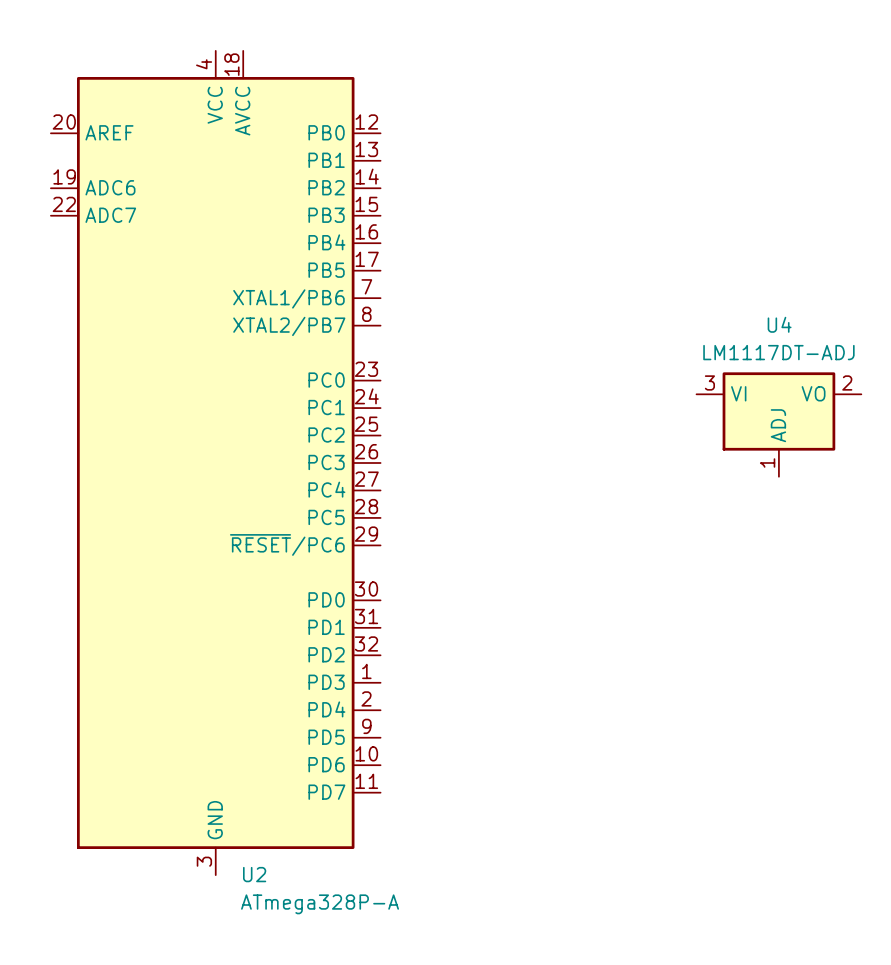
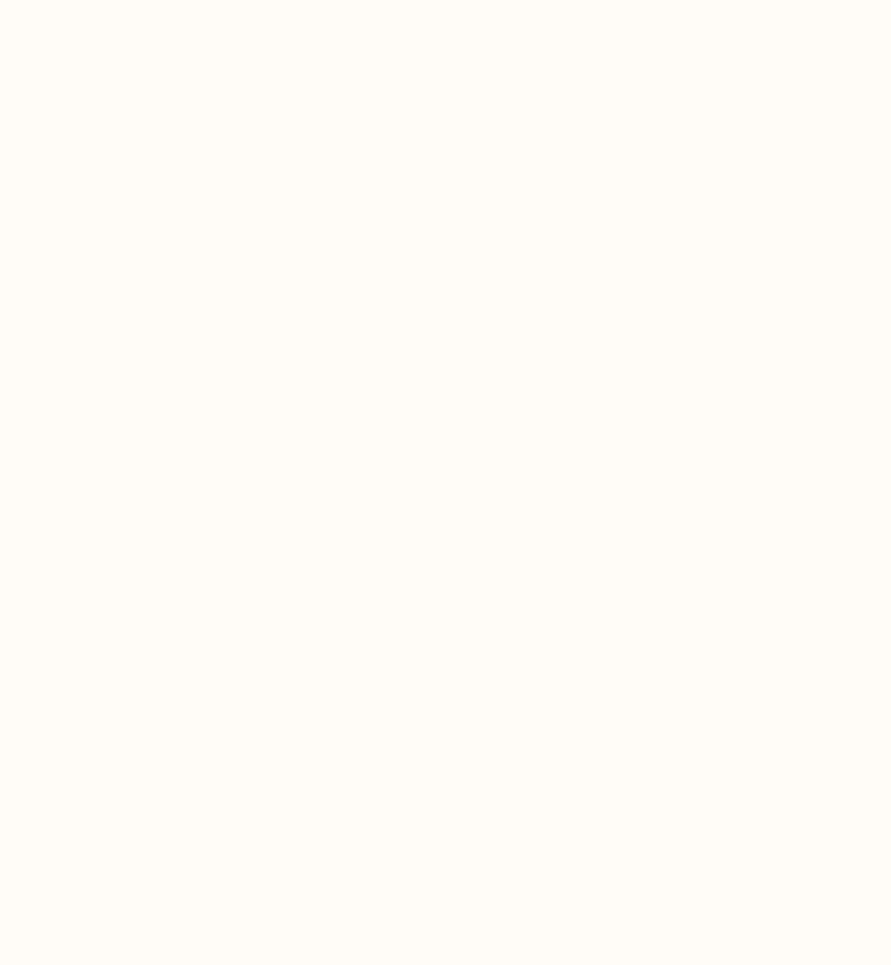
U4: LM1117DT-ADJ (778, 424) -> none
U2: ATmega328P-A (215, 462) -> none

